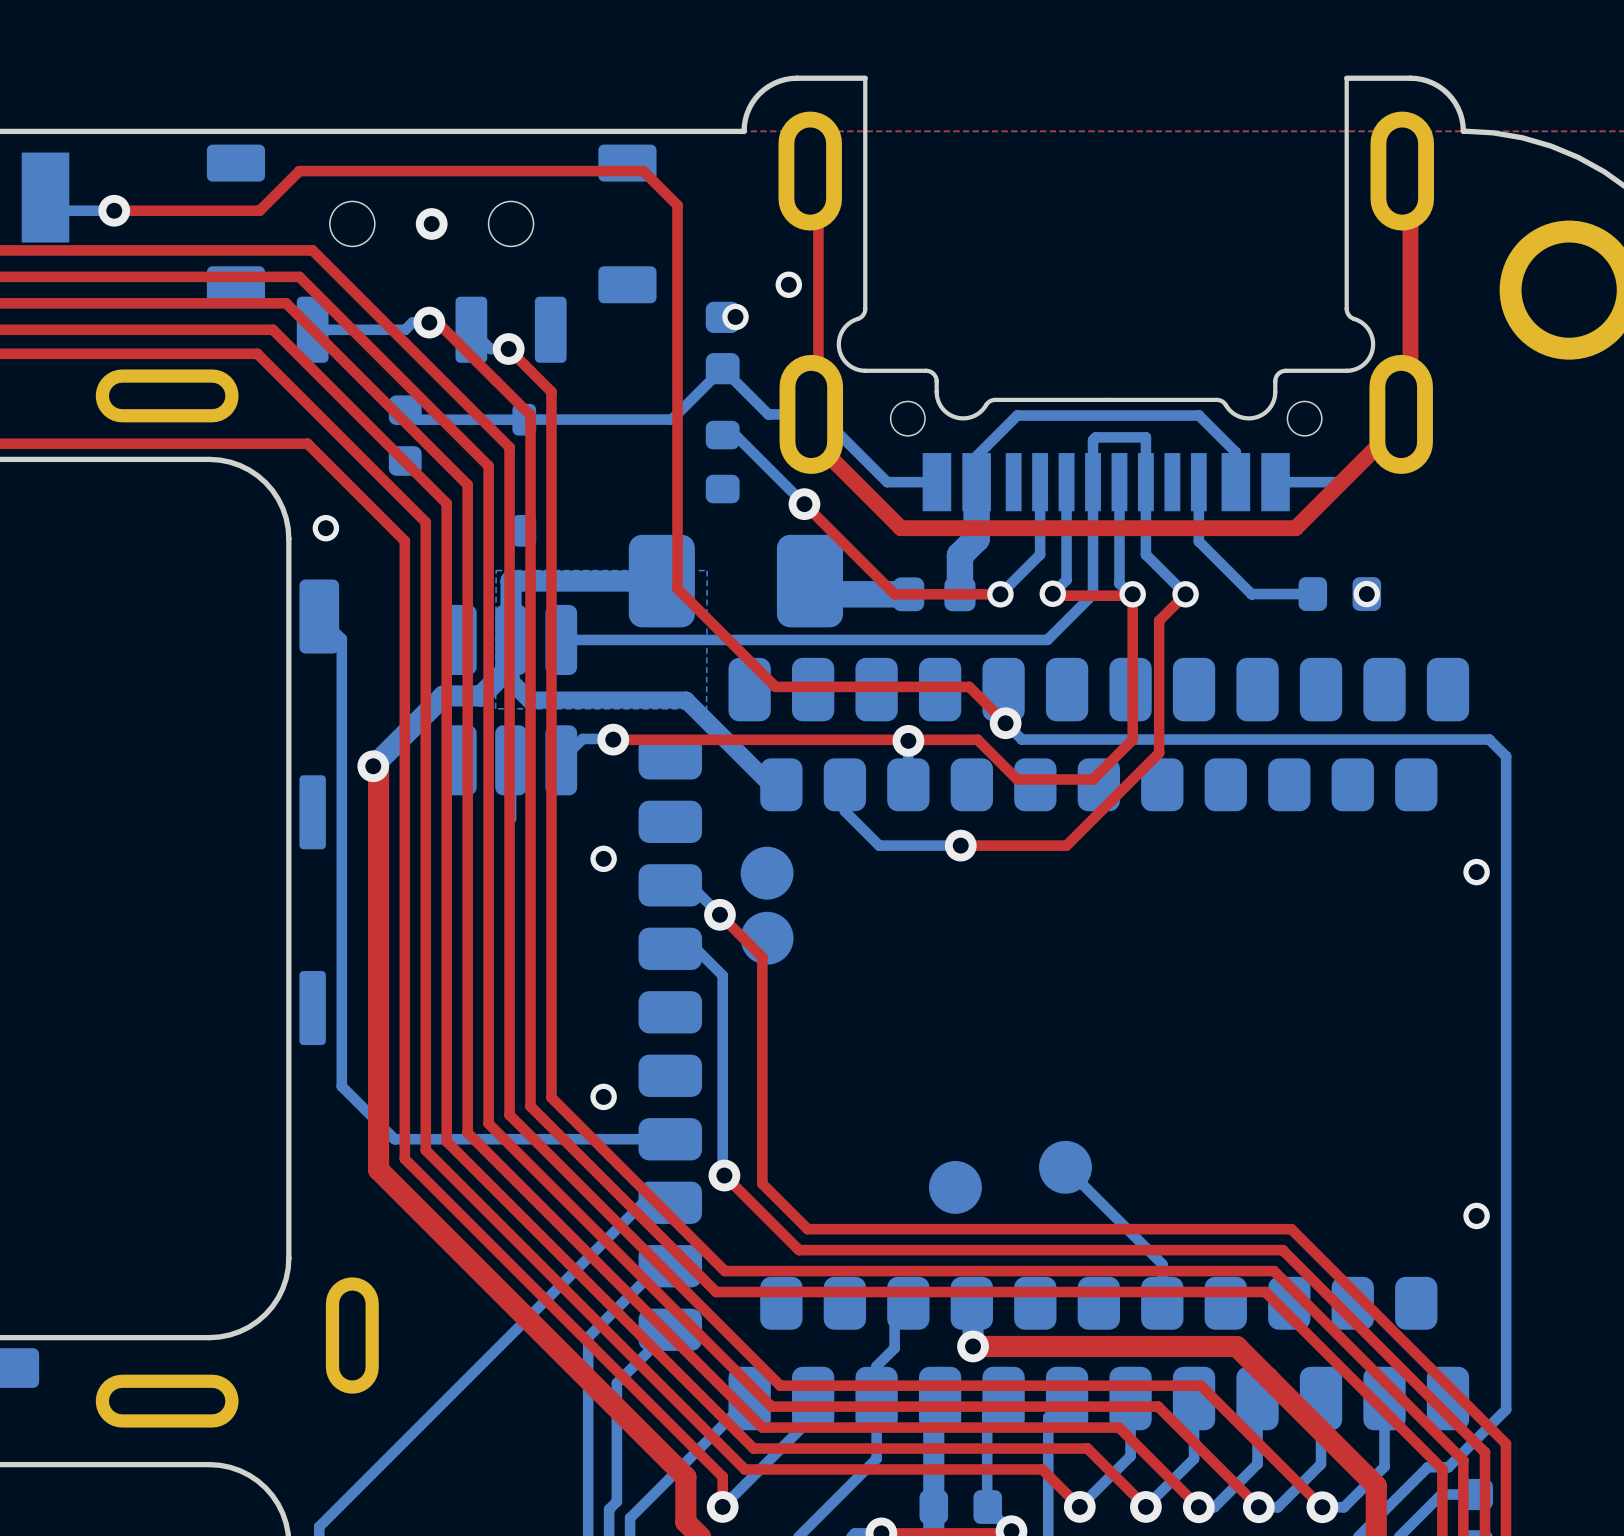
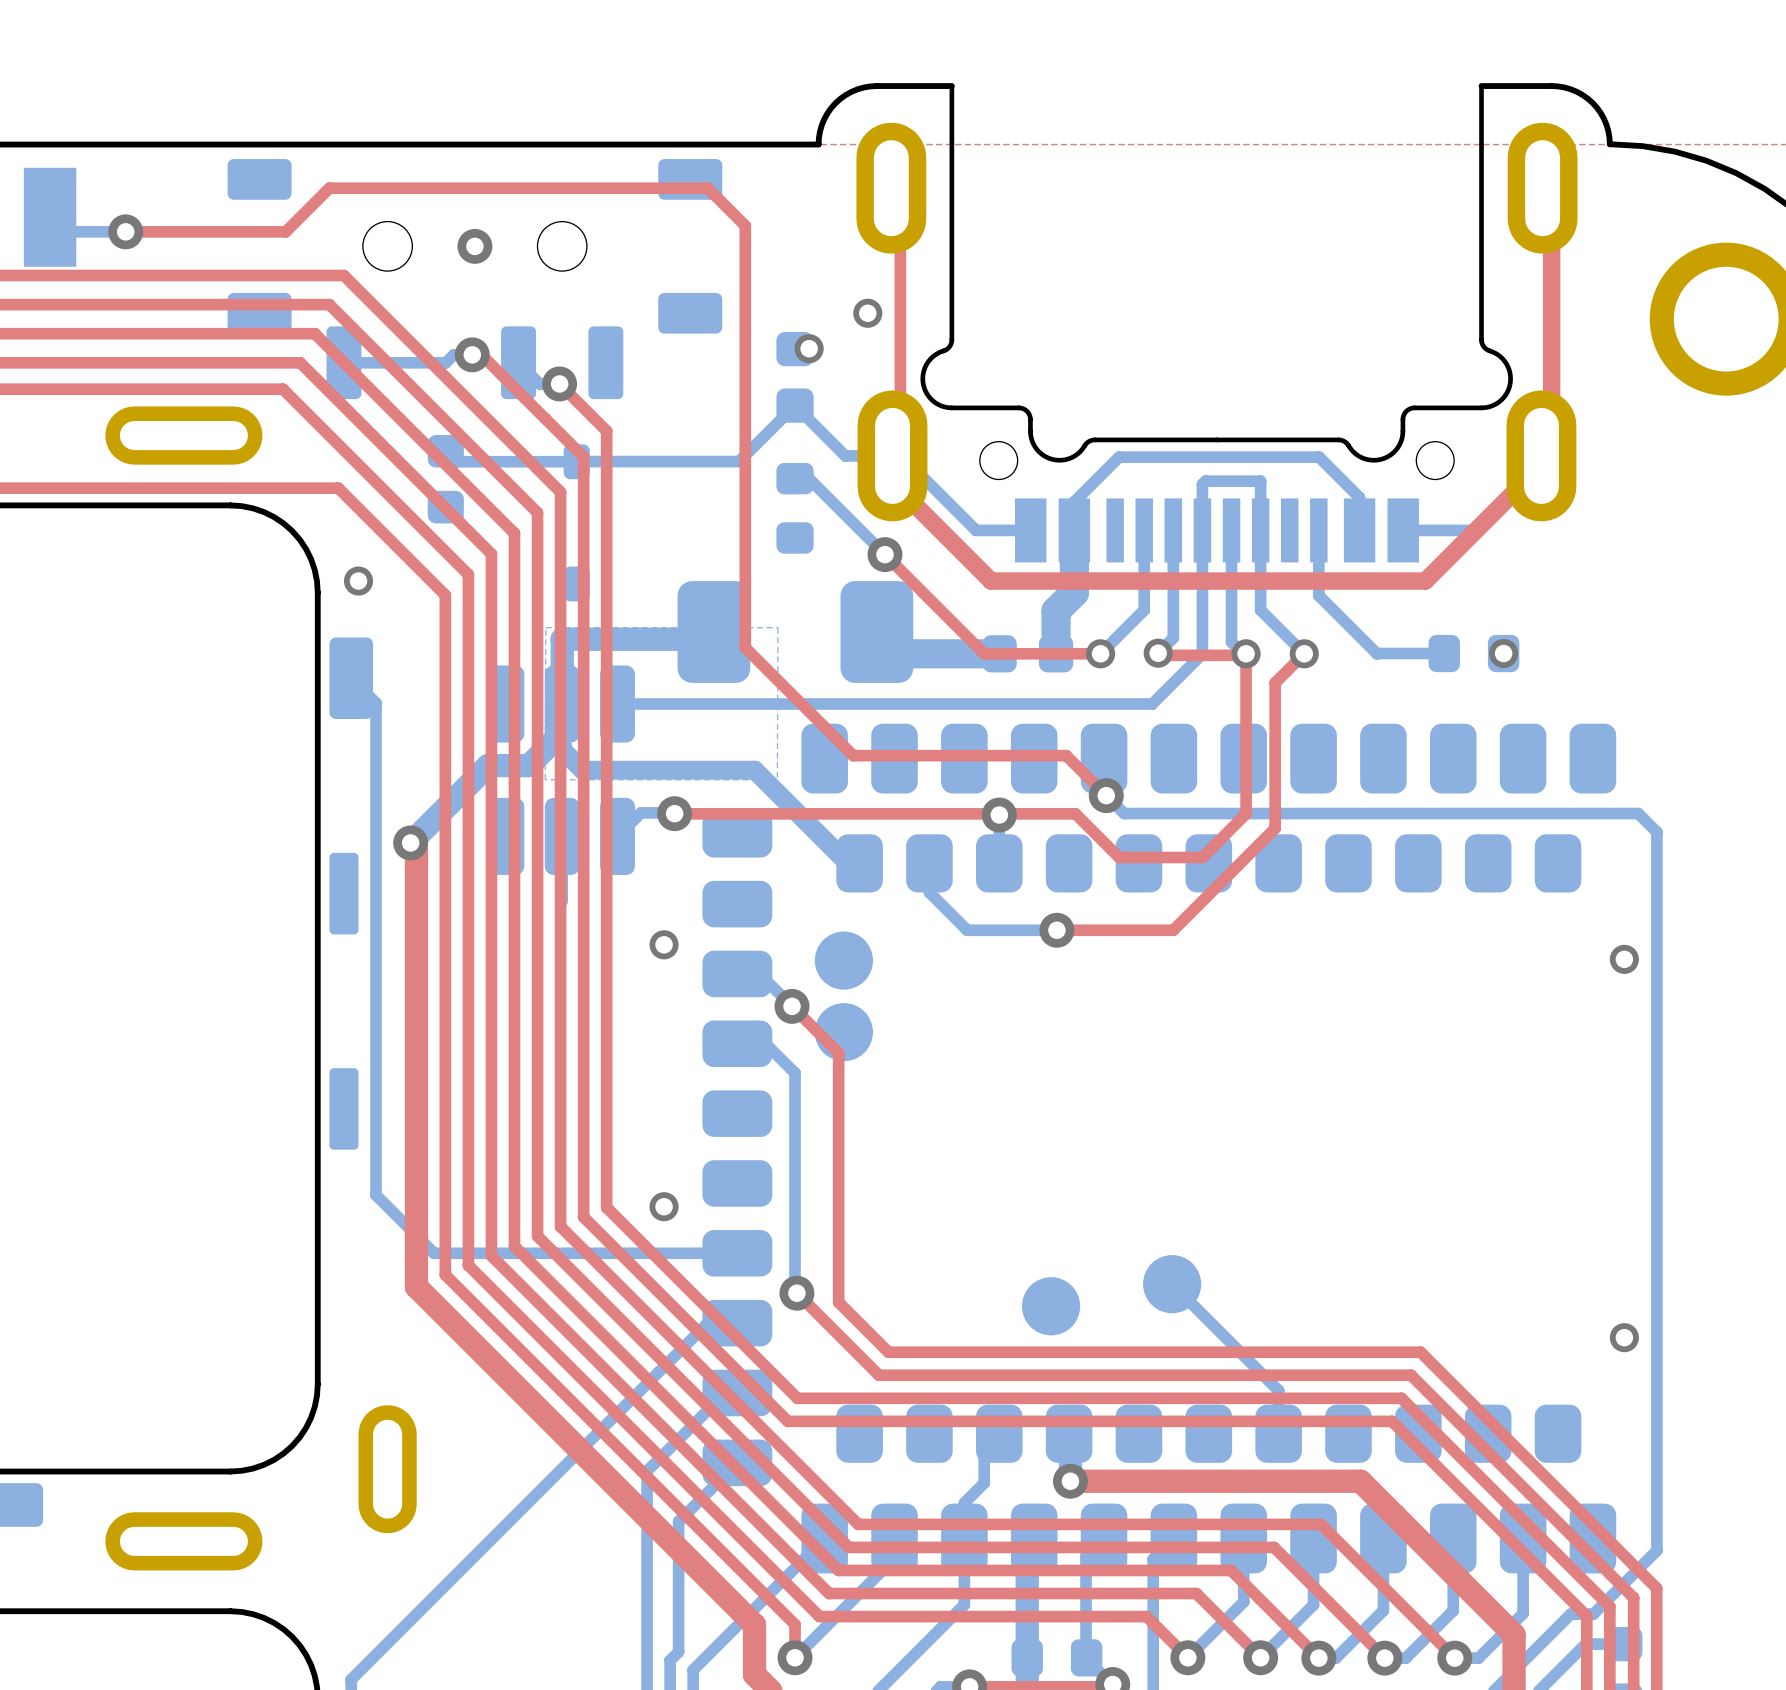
part position: (735, 581) -> (795, 632)

